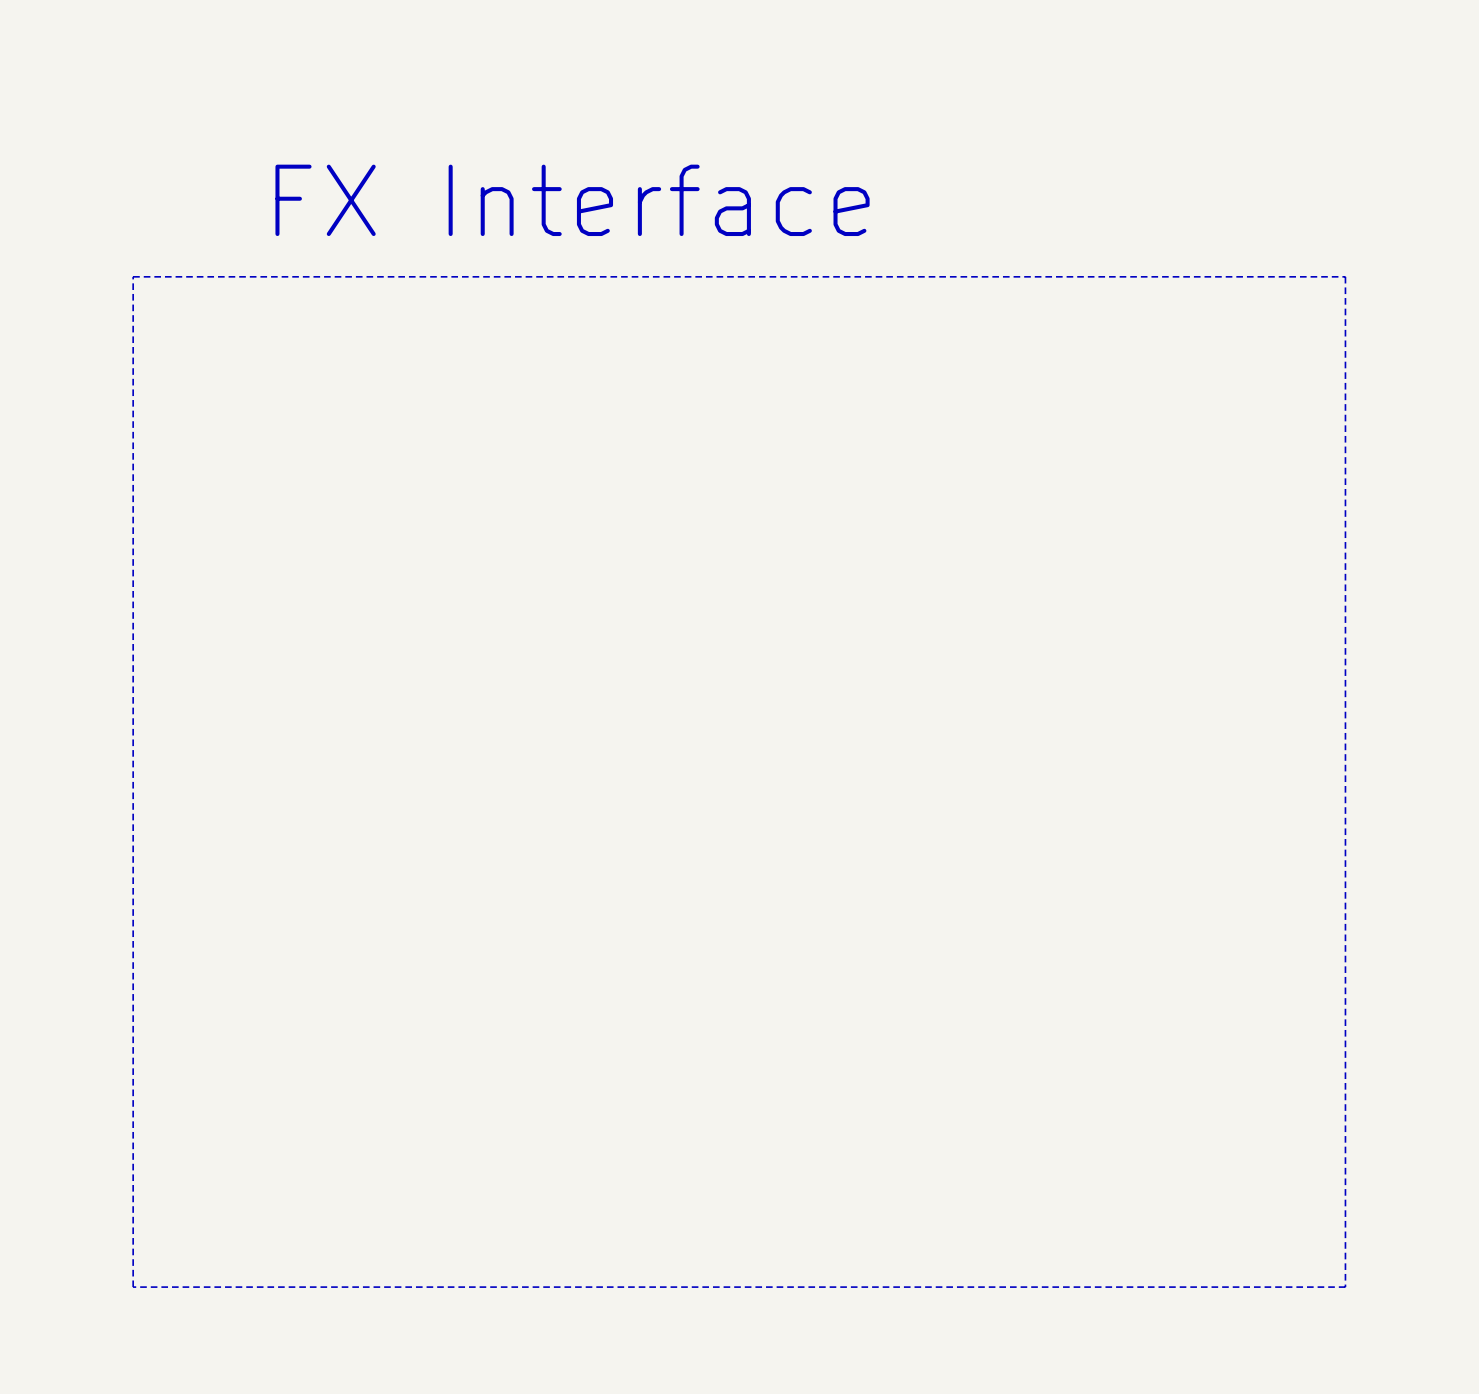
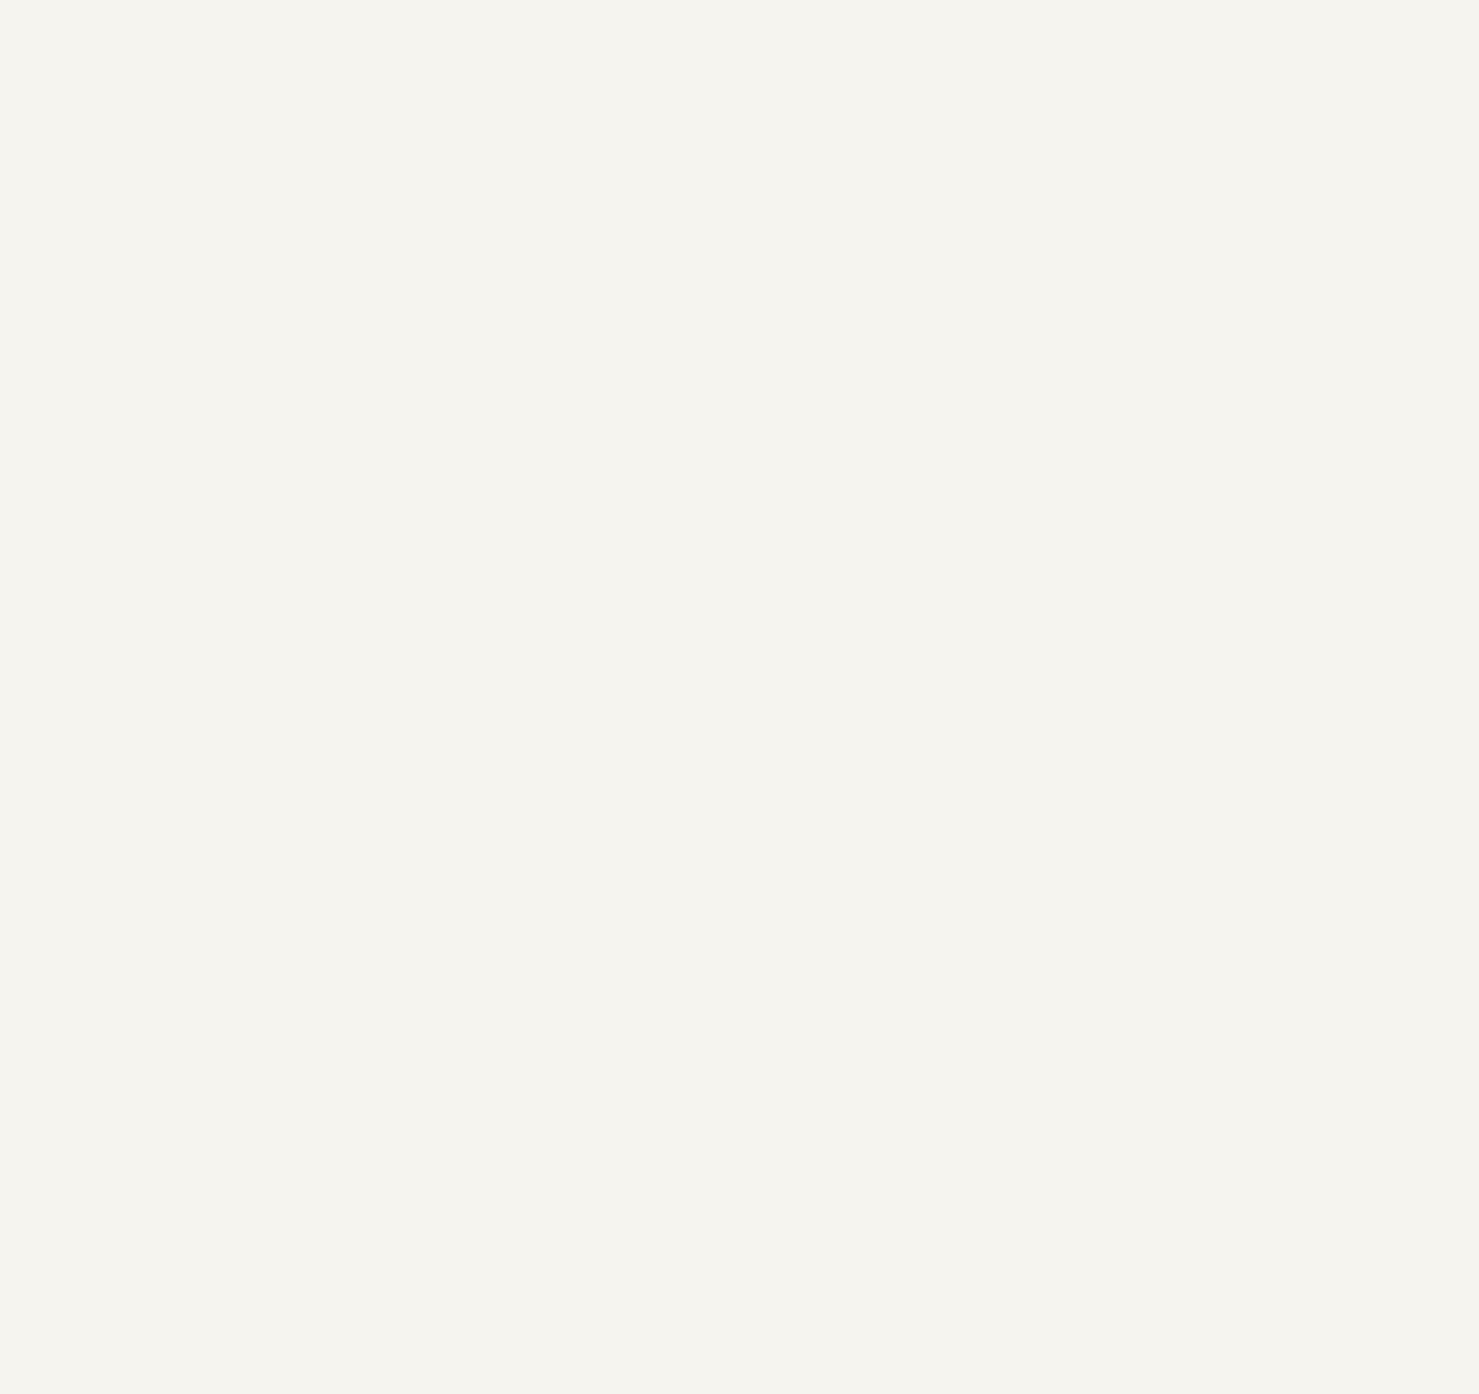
text: FX Interface (572, 200) -> none
line: (133, 276) (1345, 276) (1345, 1287) (133, 1287) (133, 276) -> none

